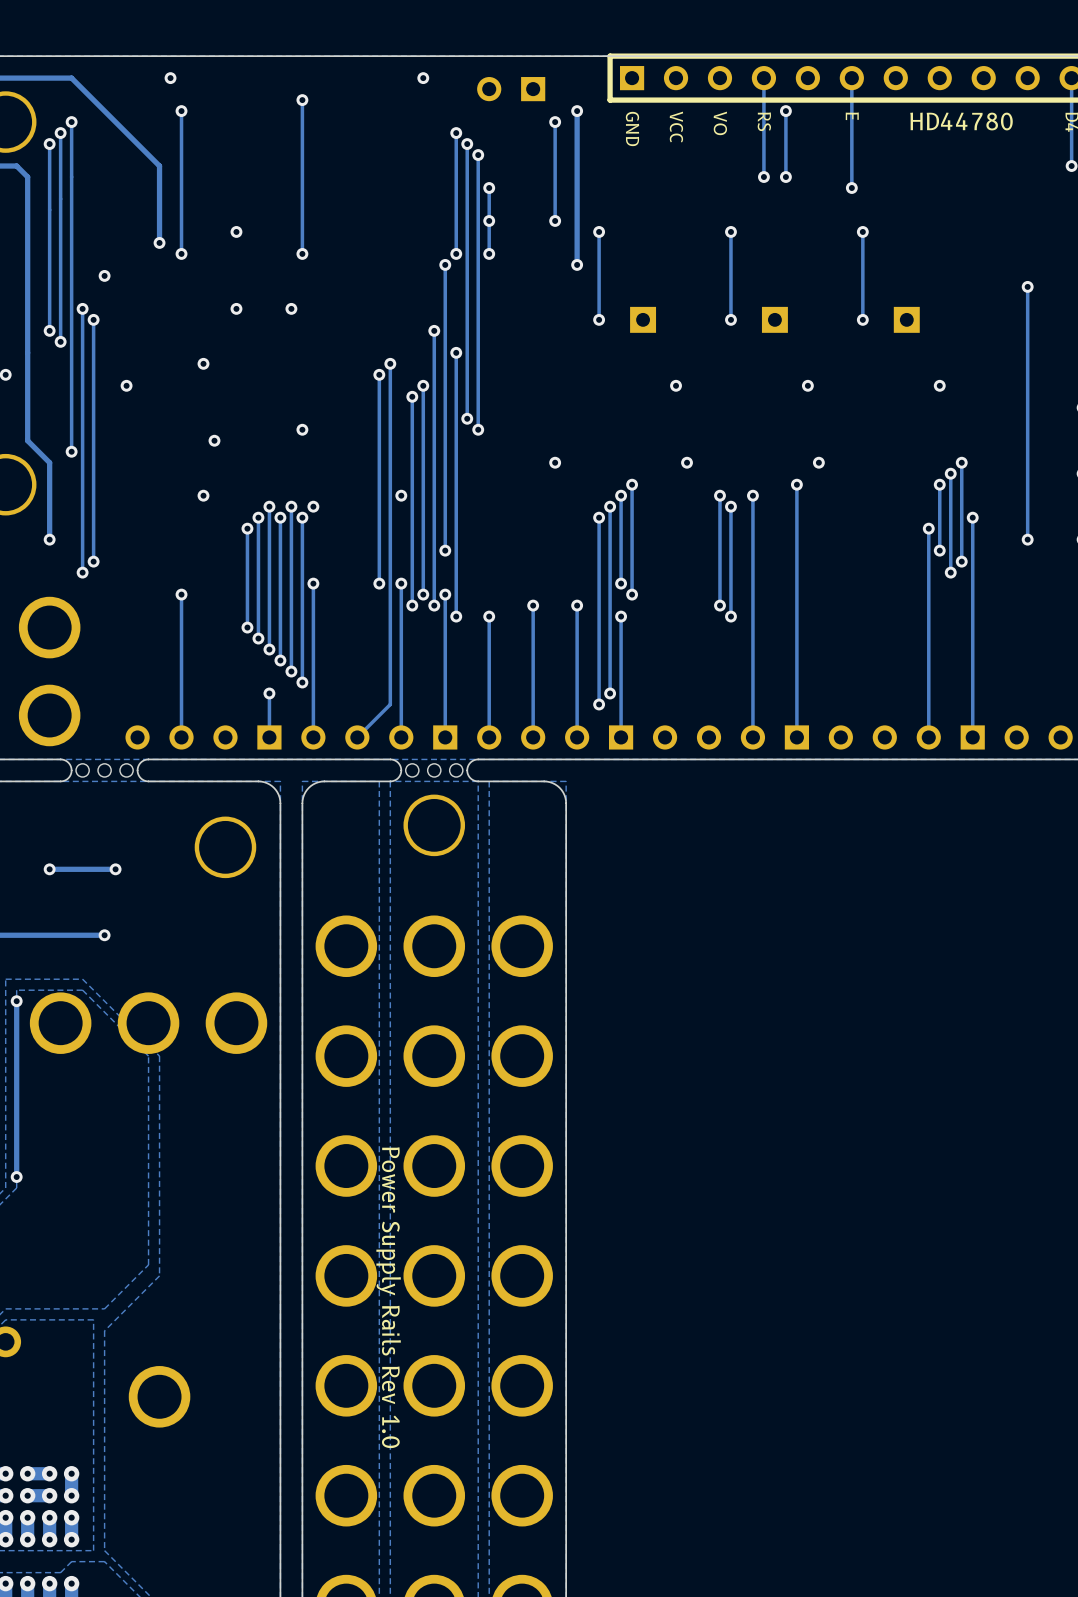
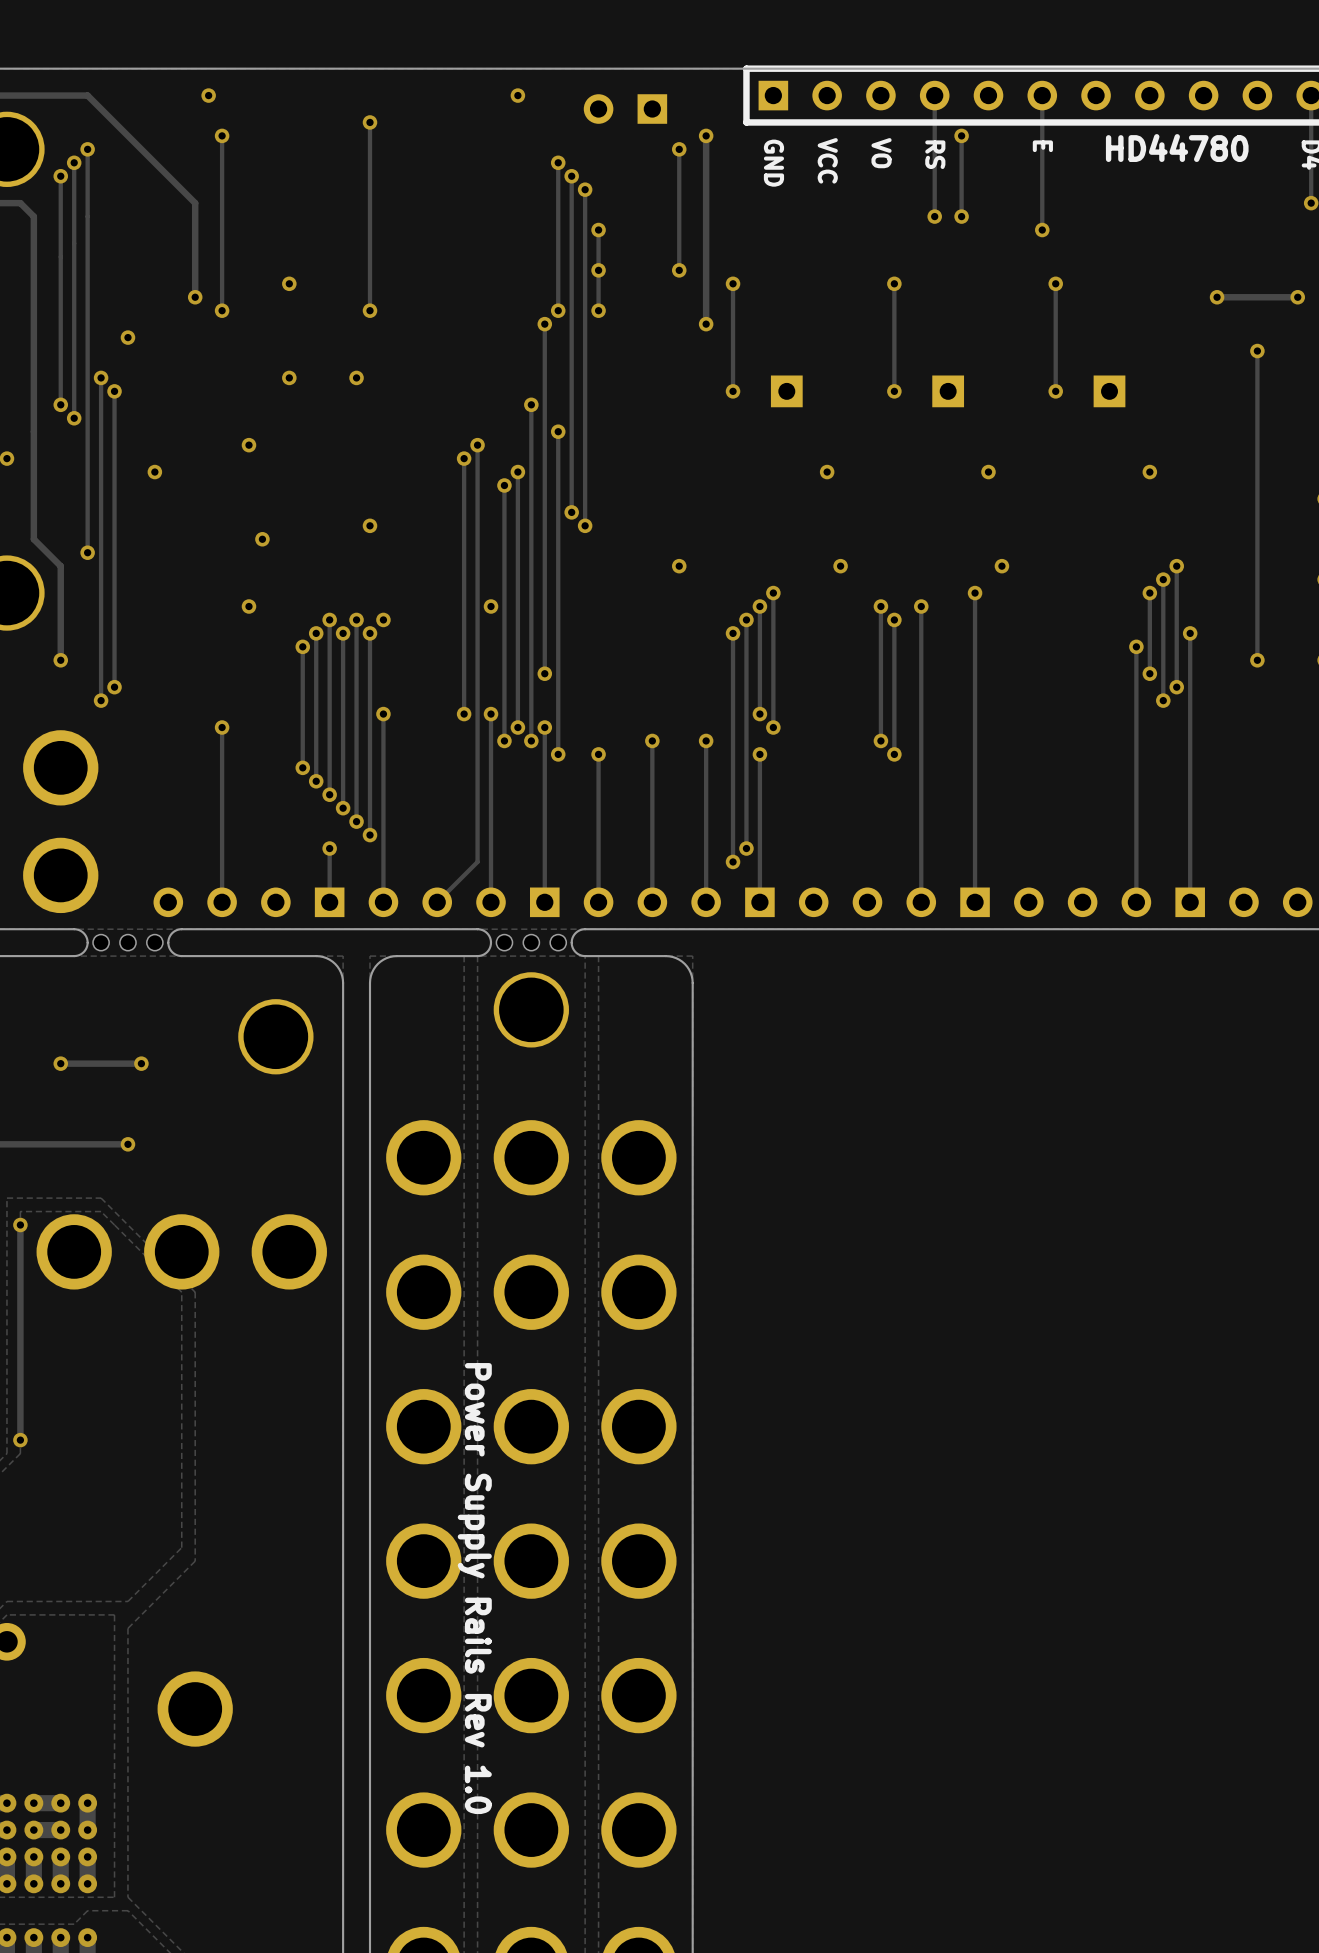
via: none -> (1217, 297)
track: none -> (1297, 297) (1217, 297)
via: none -> (1297, 297)

